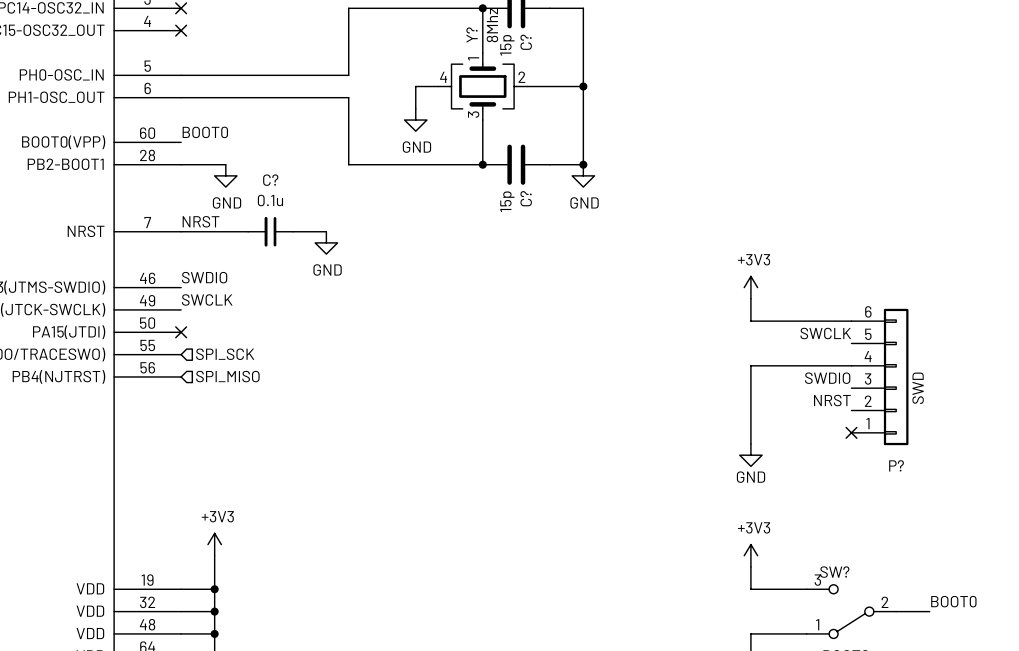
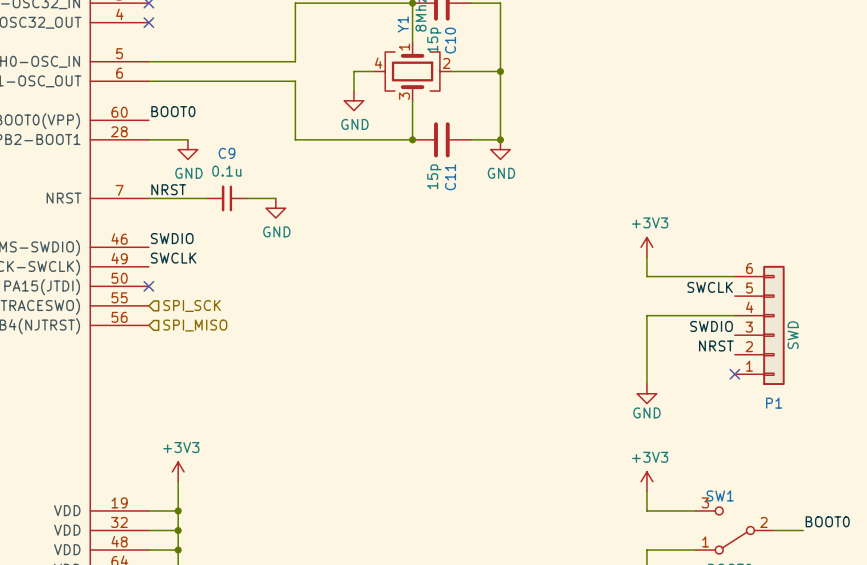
Y? name: Y? (472, 35) -> Y1 (403, 24)
C? name: C? (526, 42) -> C10 (450, 40)
C? name: C? (270, 180) -> C9 (227, 153)
C? name: C? (526, 198) -> C11 (450, 177)
P? name: P? (896, 465) -> P1 (774, 403)
SW? name: SW? (834, 572) -> SW1 (720, 495)

